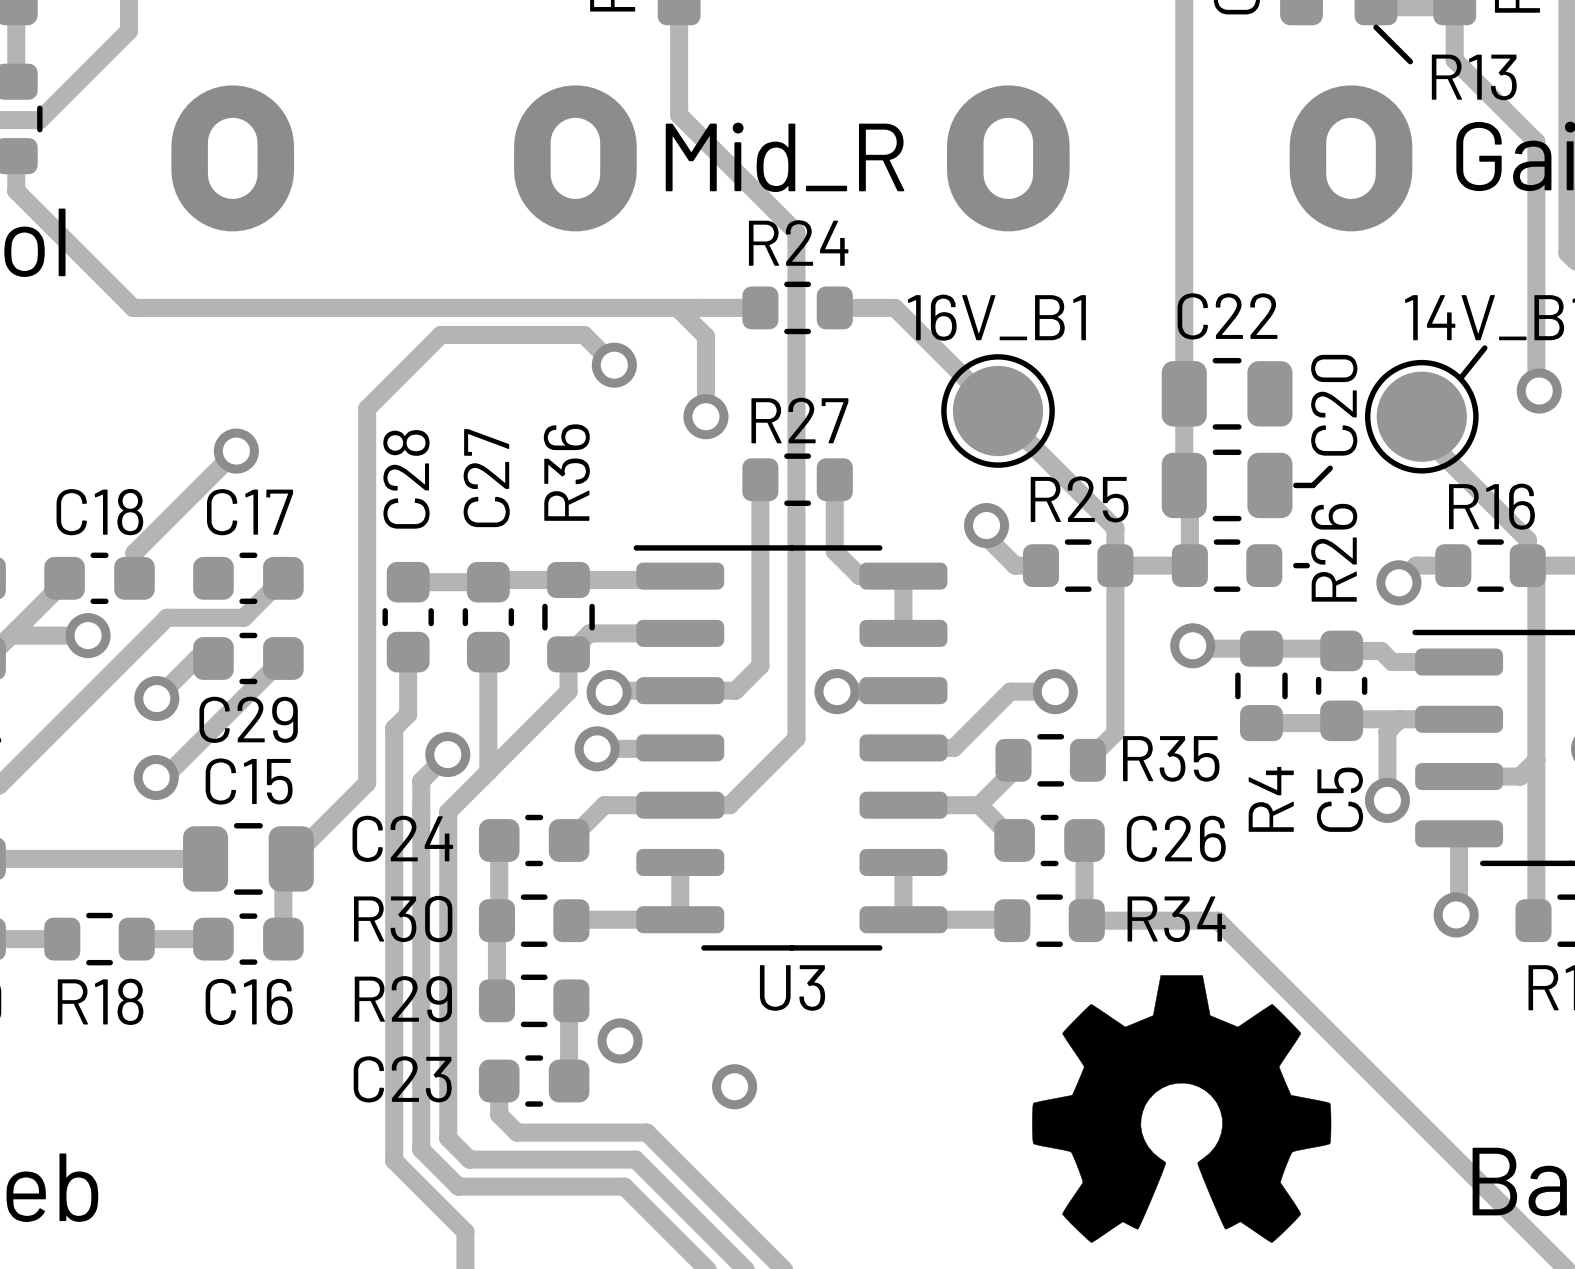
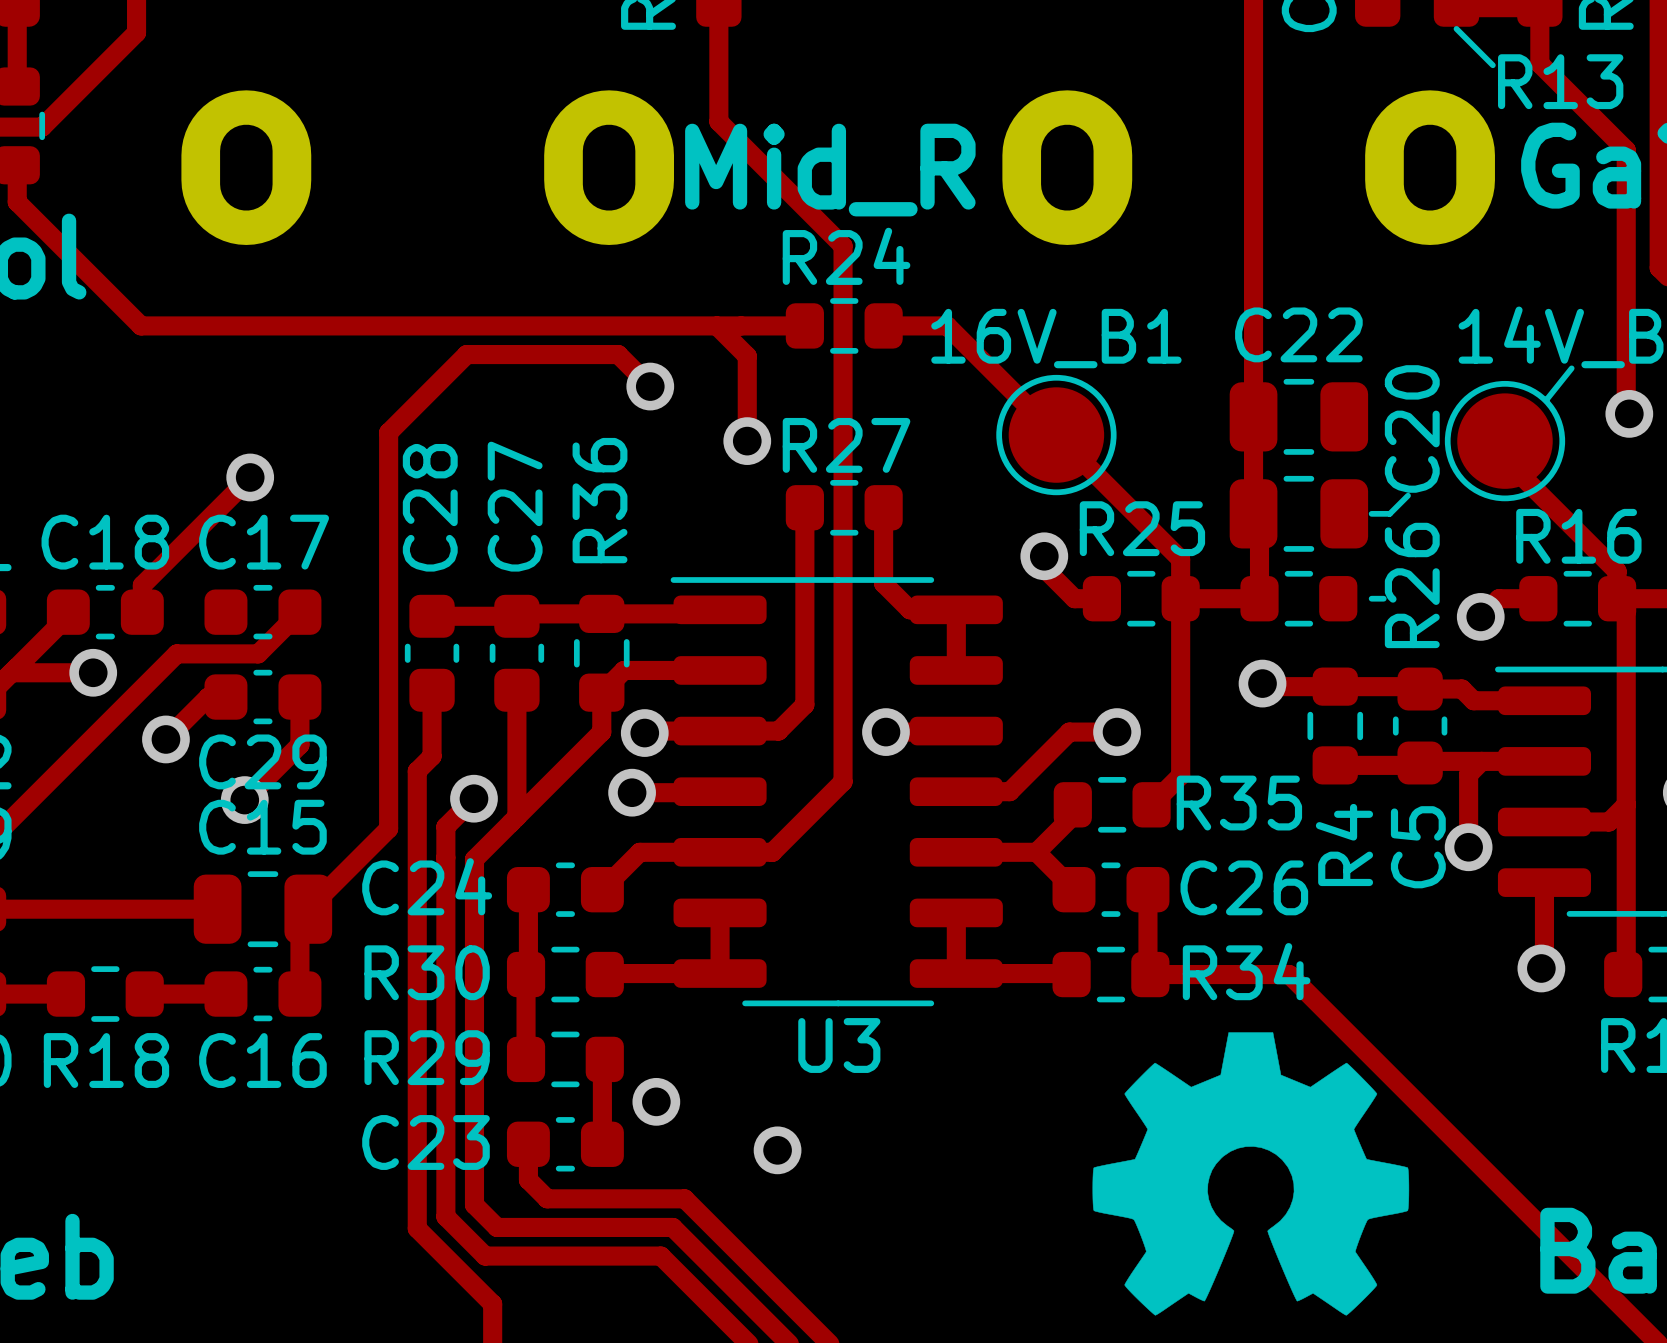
track: (283, 658) (164, 777) (156, 777) -> (299, 697) (299, 744) (244, 800)
via position: (156, 777) -> (244, 800)

